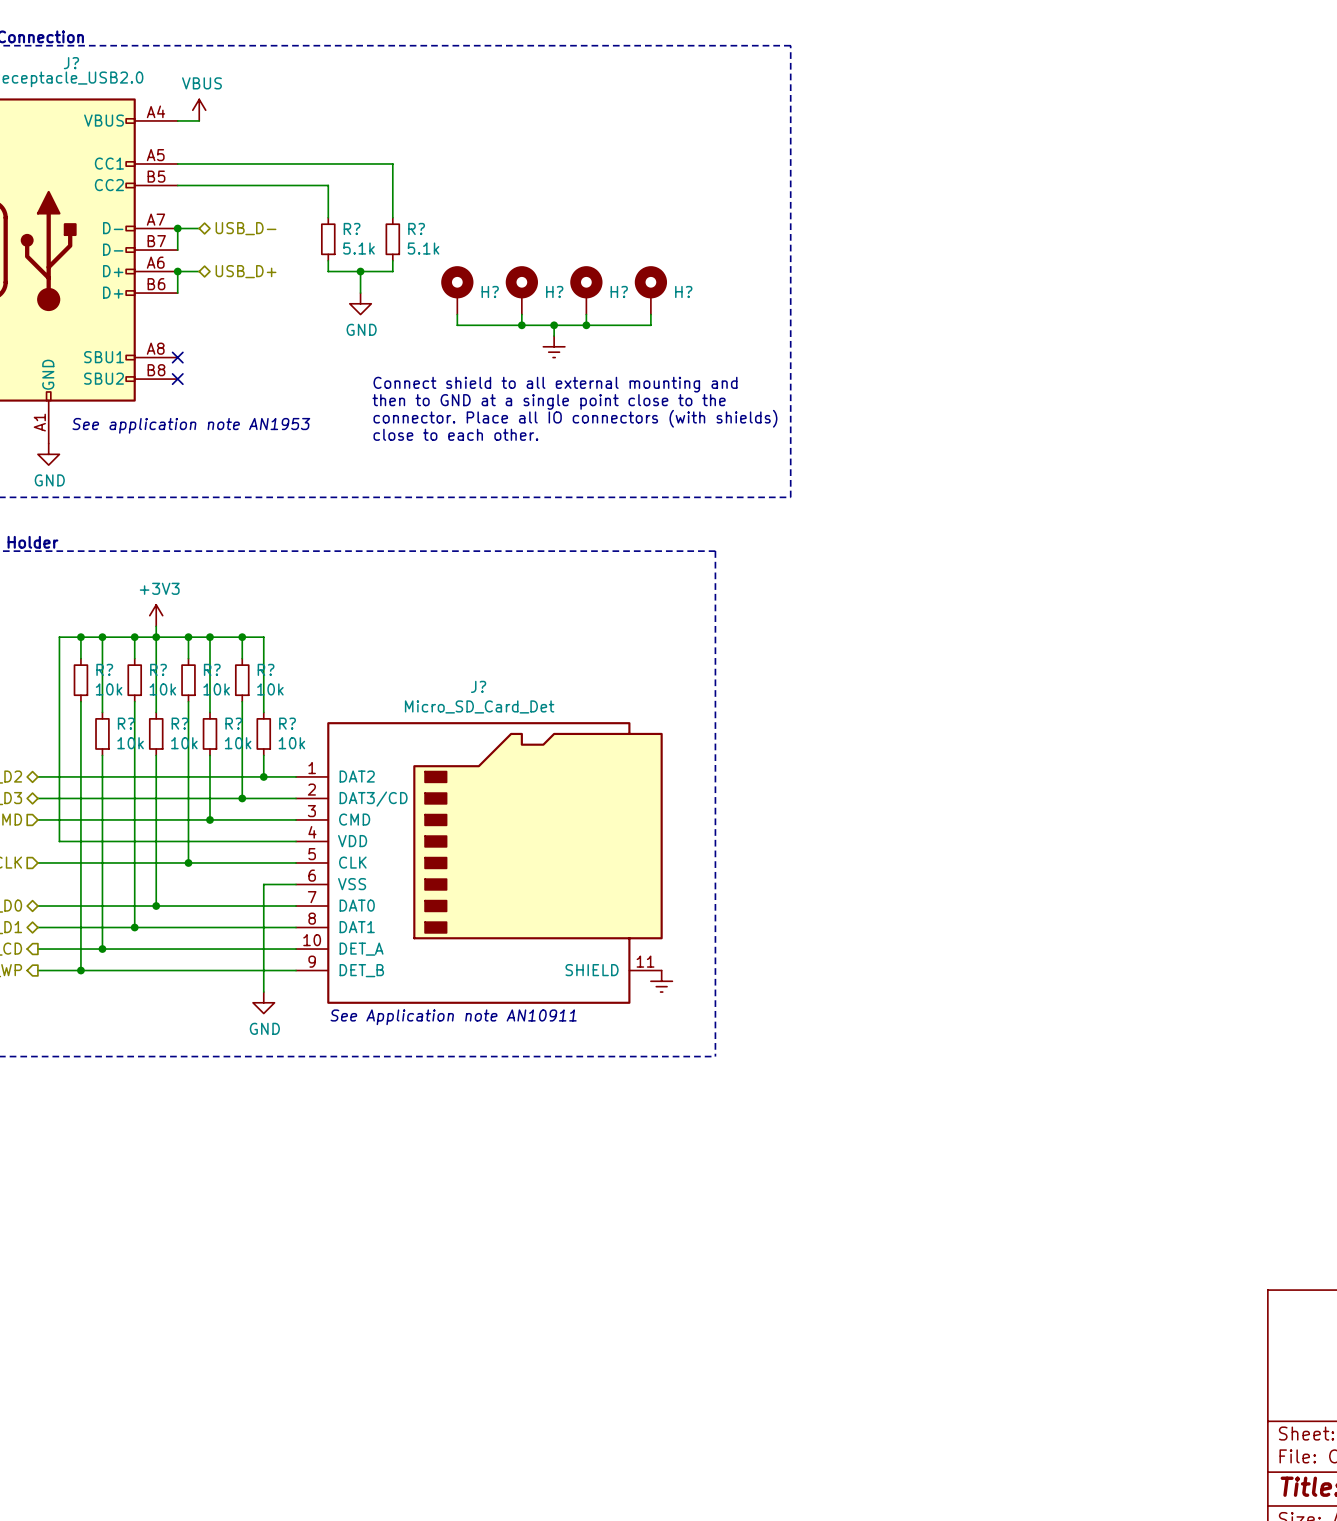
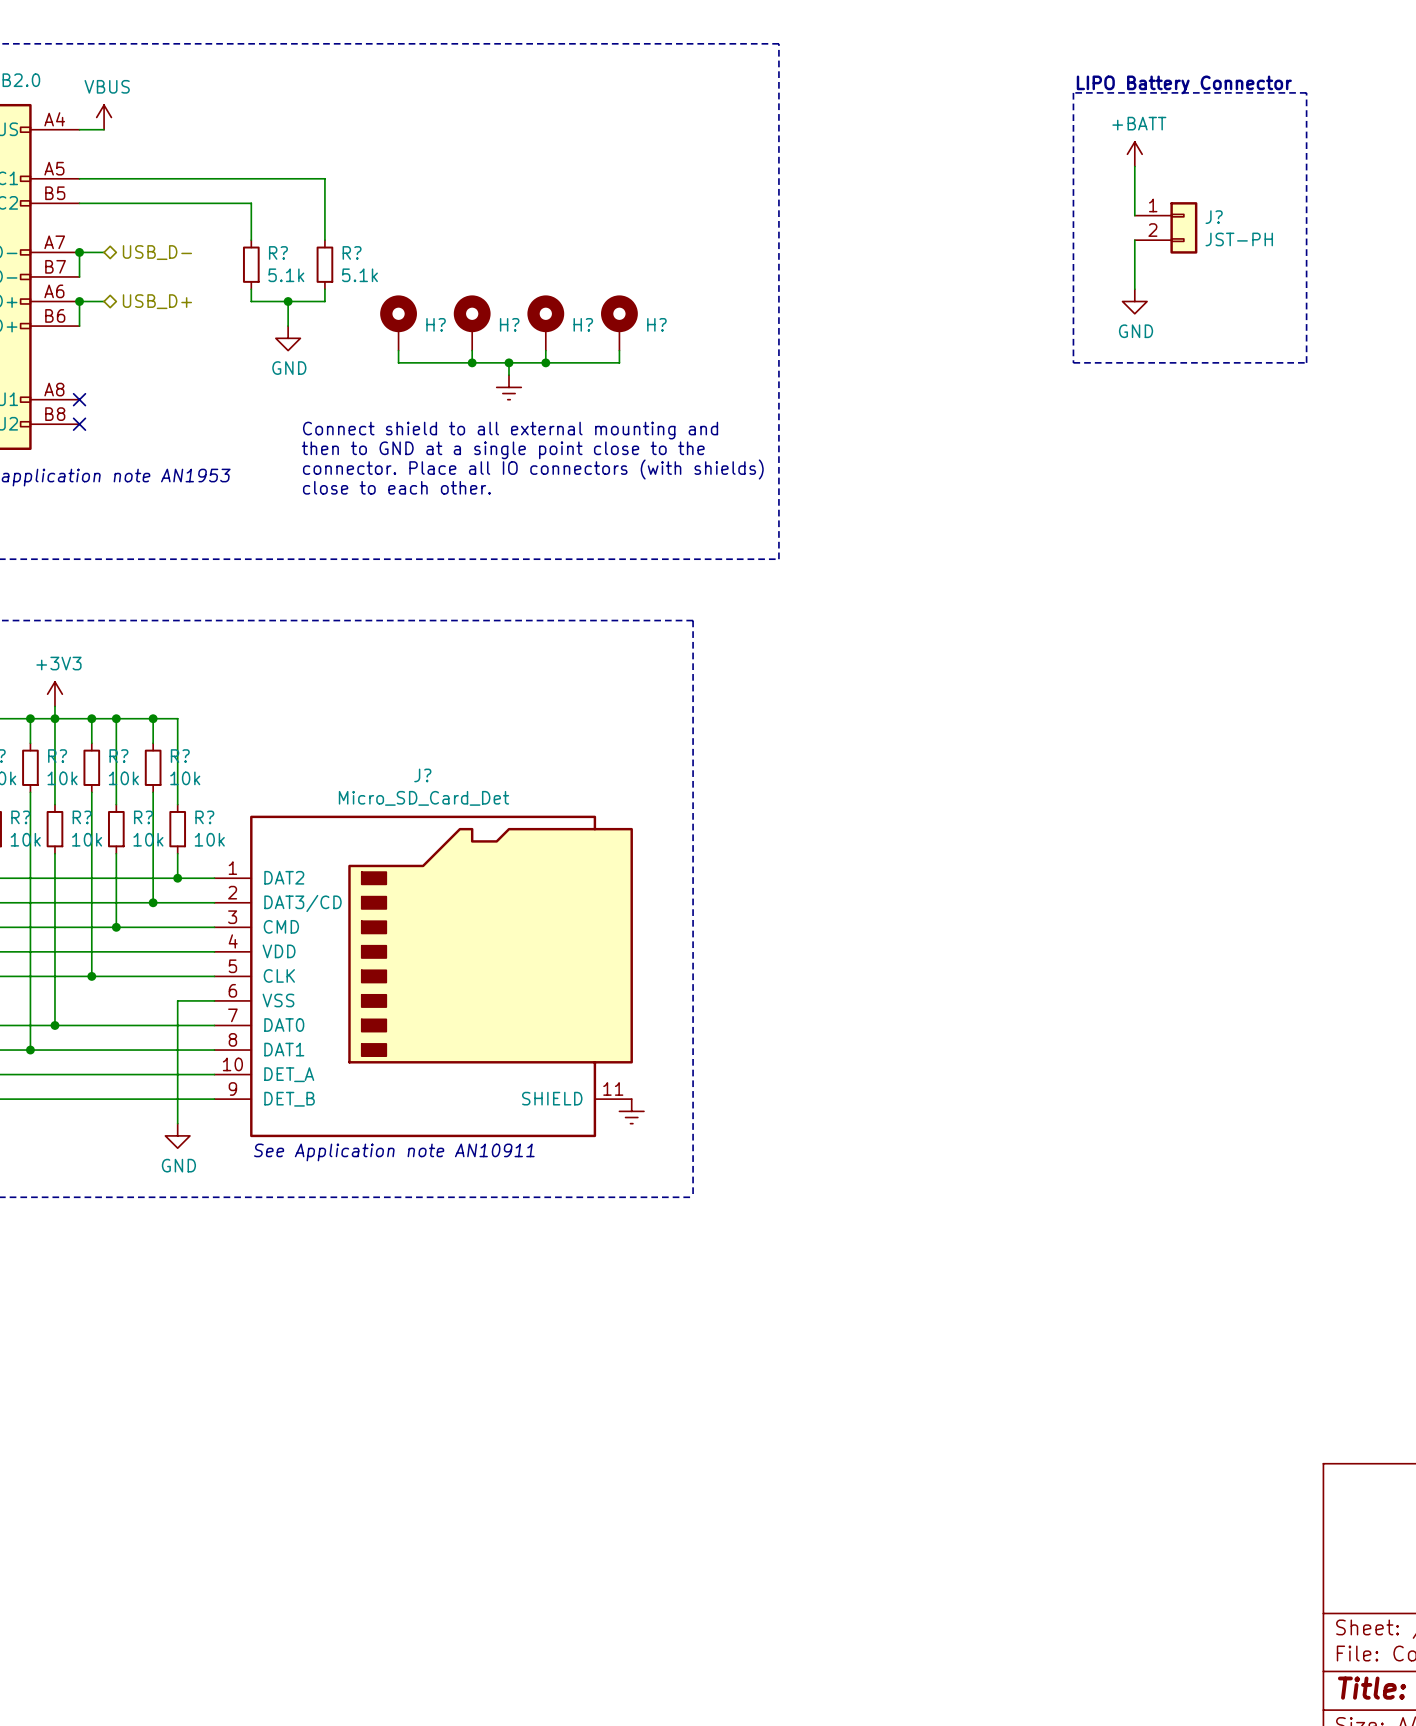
text: none -> LIPO Battery Connector (1184, 84)
line: none -> (1073, 92) (1306, 92) (1306, 362) (1073, 362) (1073, 92)
power symbol: none -> +BATT (1134, 154)
wire: none -> (1134, 166) (1134, 215)
J?: none -> JST-PH (1166, 227)
wire: none -> (1134, 240) (1134, 289)
power symbol: none -> GND (1134, 301)

